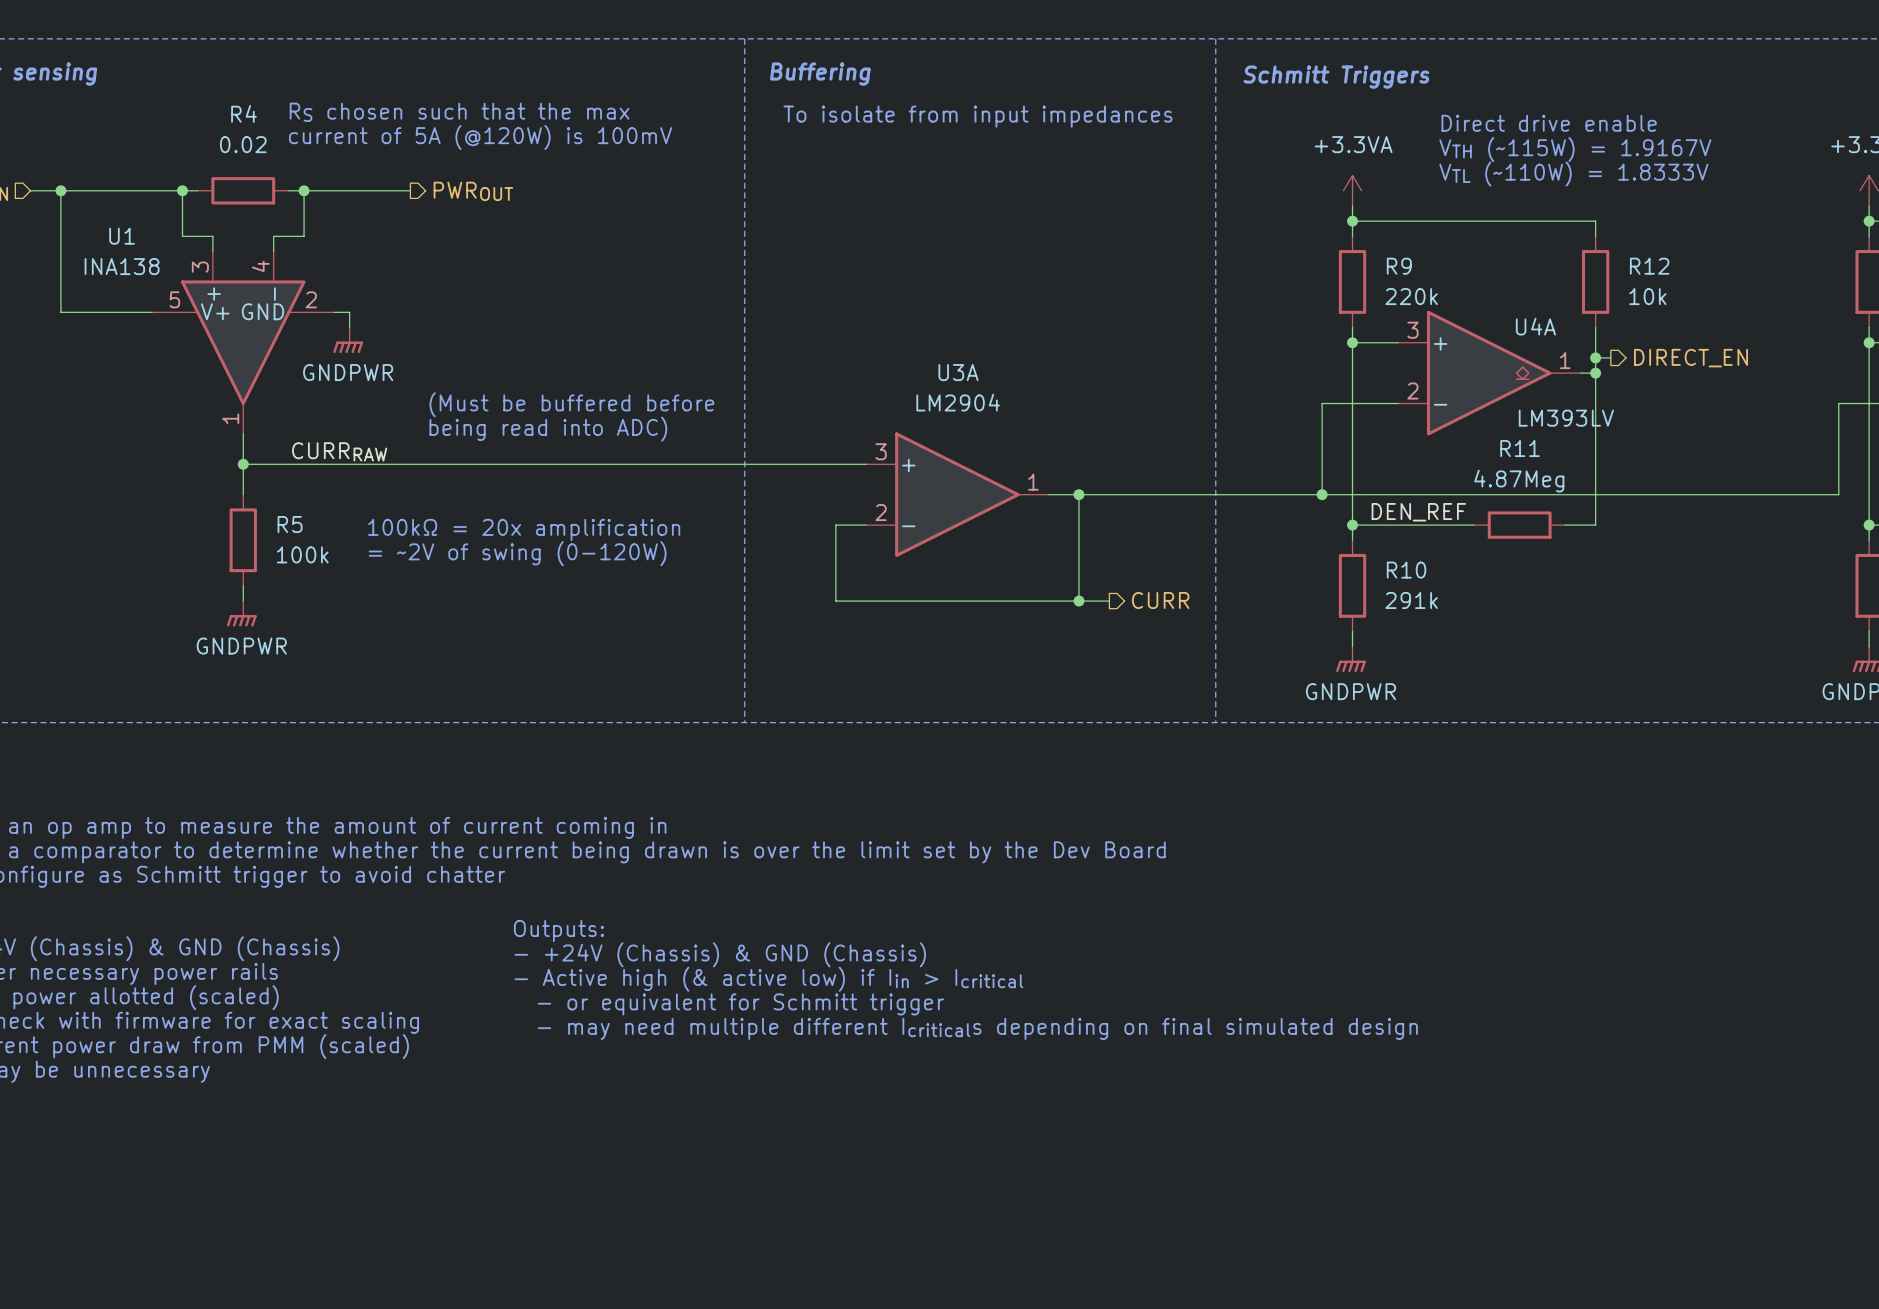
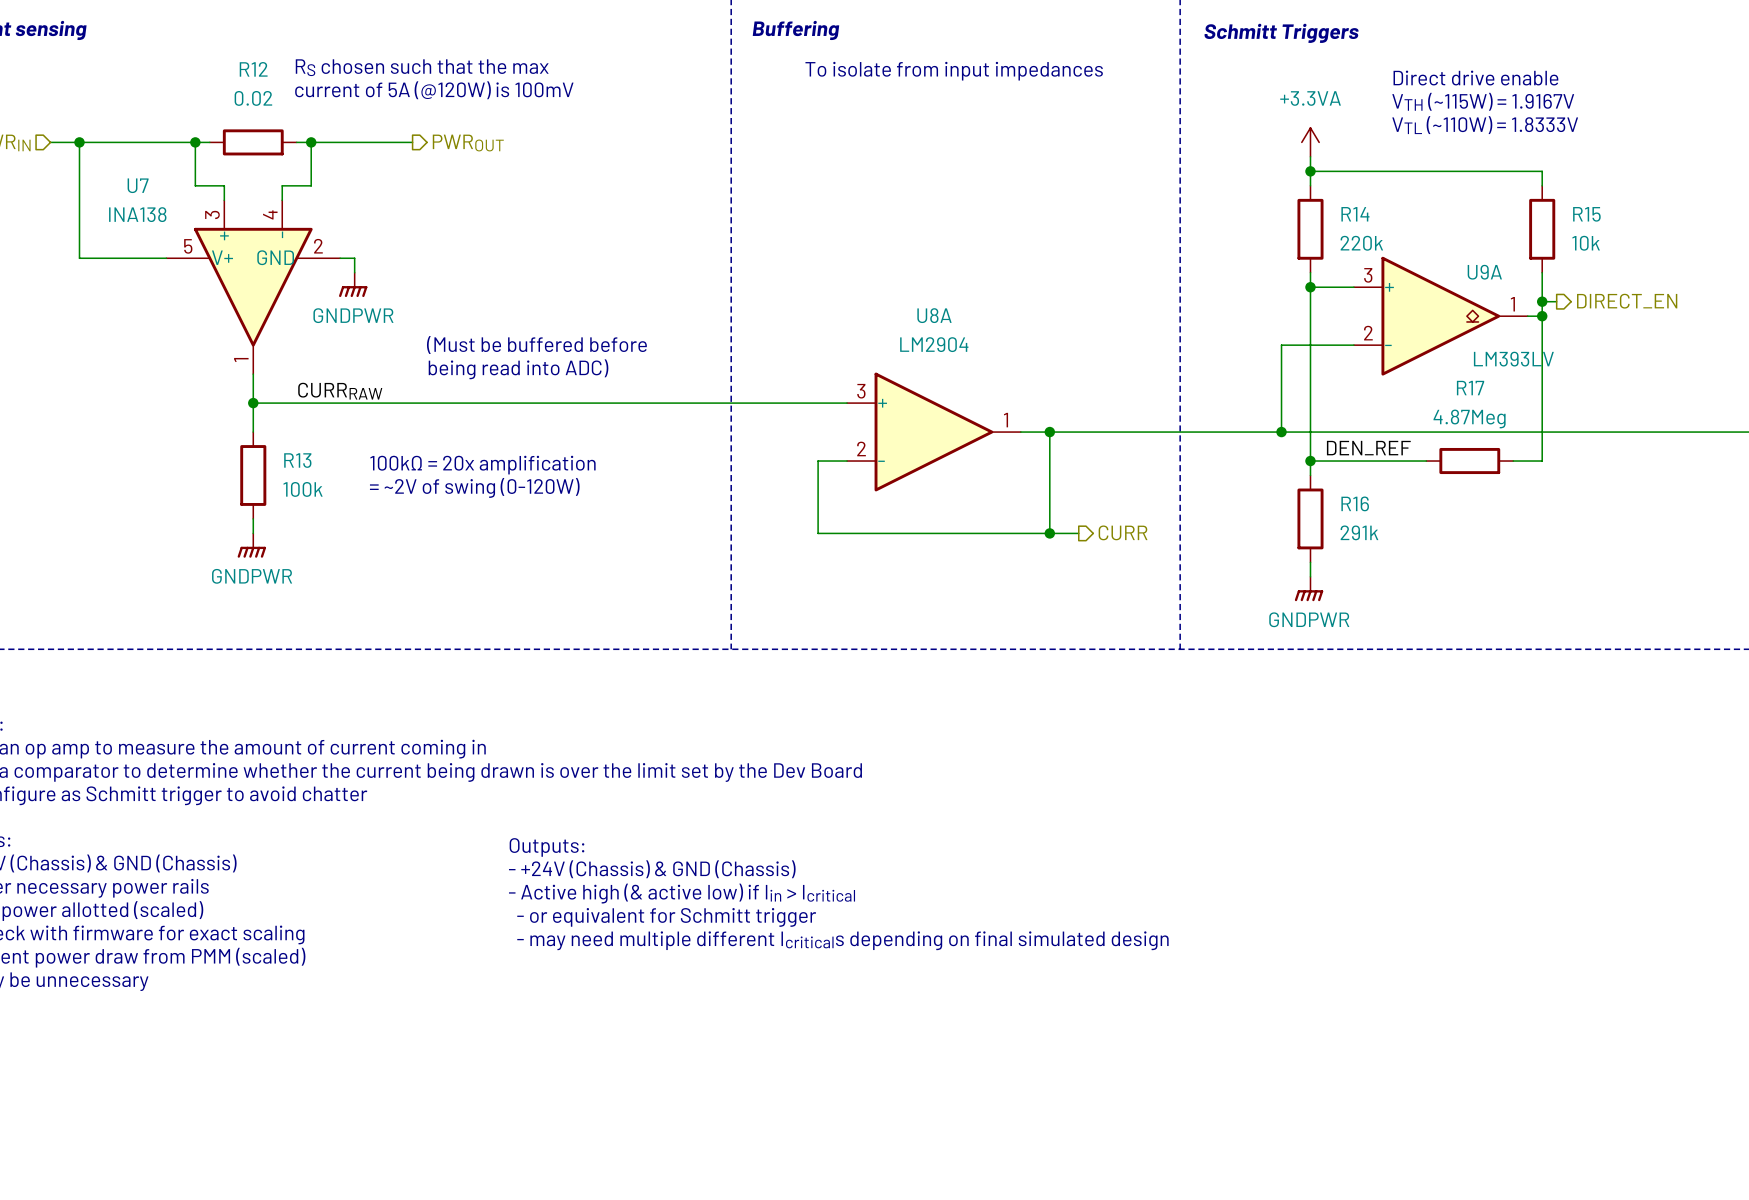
R4 name: R4 (244, 113) -> R12 (253, 69)
U1 name: U1 (122, 236) -> U7 (138, 185)
R9 name: R9 (1399, 266) -> R14 (1355, 214)
R12 name: R12 (1649, 266) -> R15 (1586, 214)
U4A name: U4A (1535, 326) -> U9A (1484, 272)
U3A name: U3A (958, 372) -> U8A (934, 315)
R11 name: R11 (1520, 448) -> R17 (1470, 388)
R5 name: R5 (290, 524) -> R13 (297, 460)
R10 name: R10 (1406, 570) -> R16 (1355, 503)

